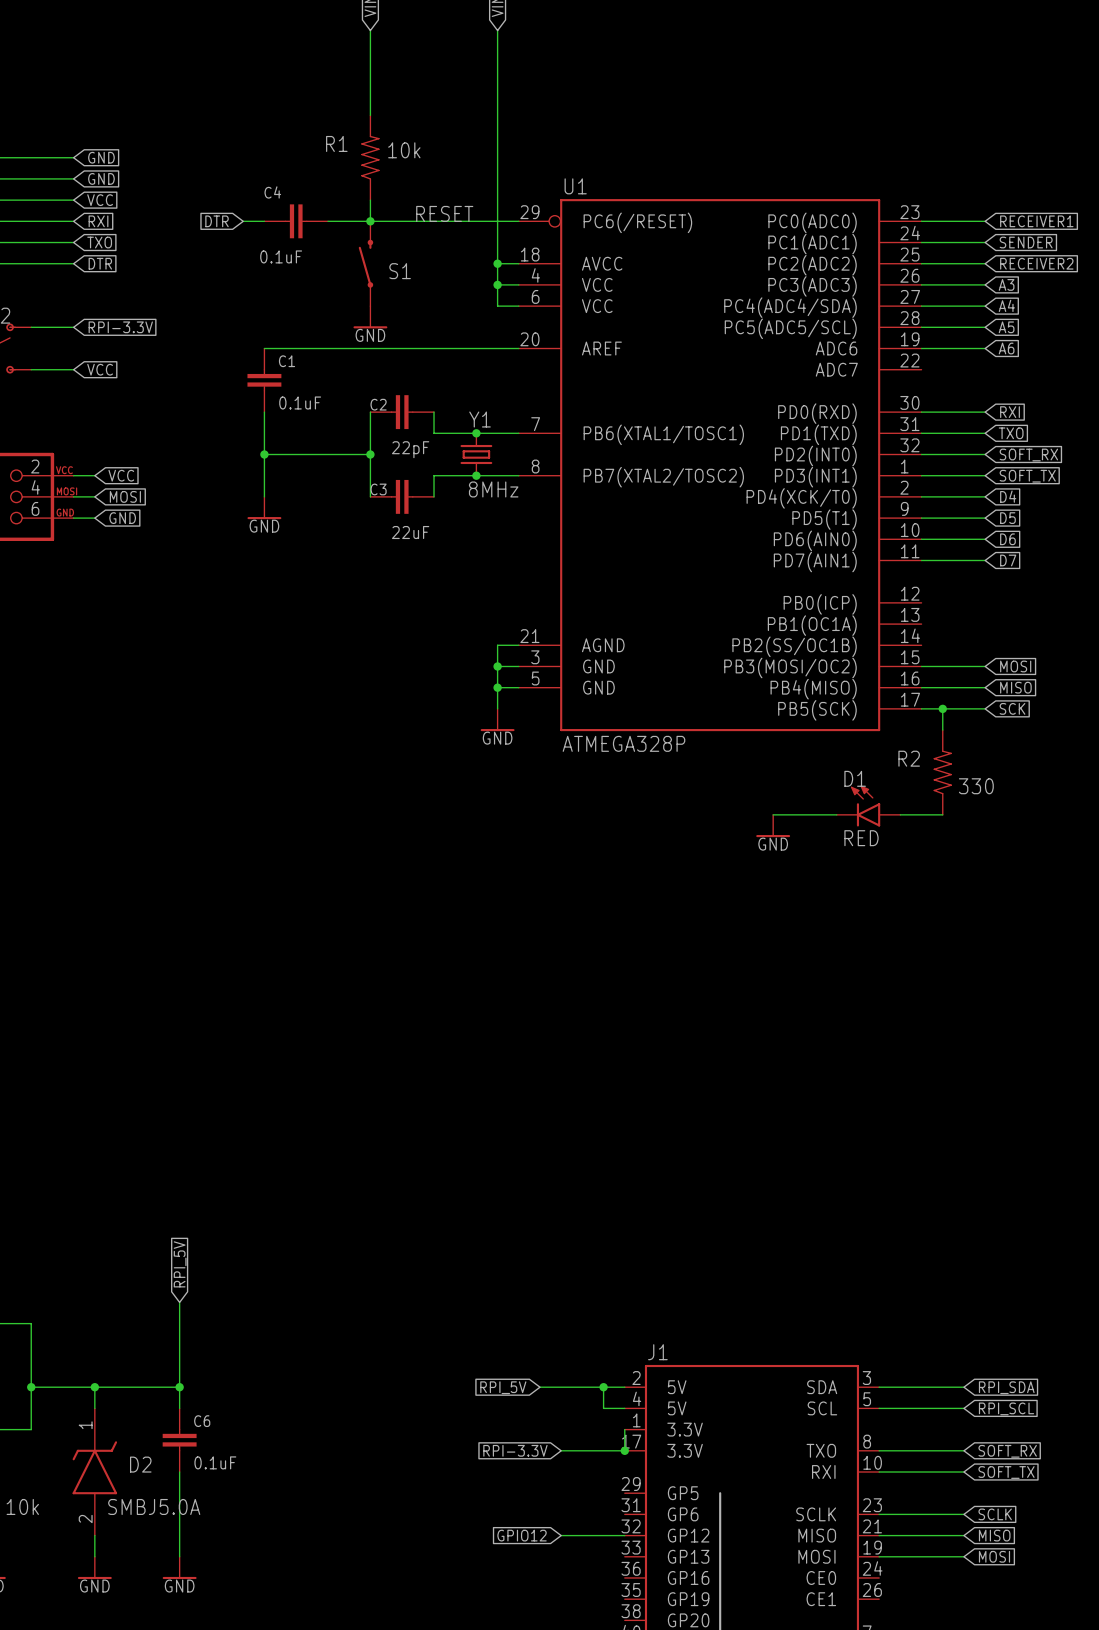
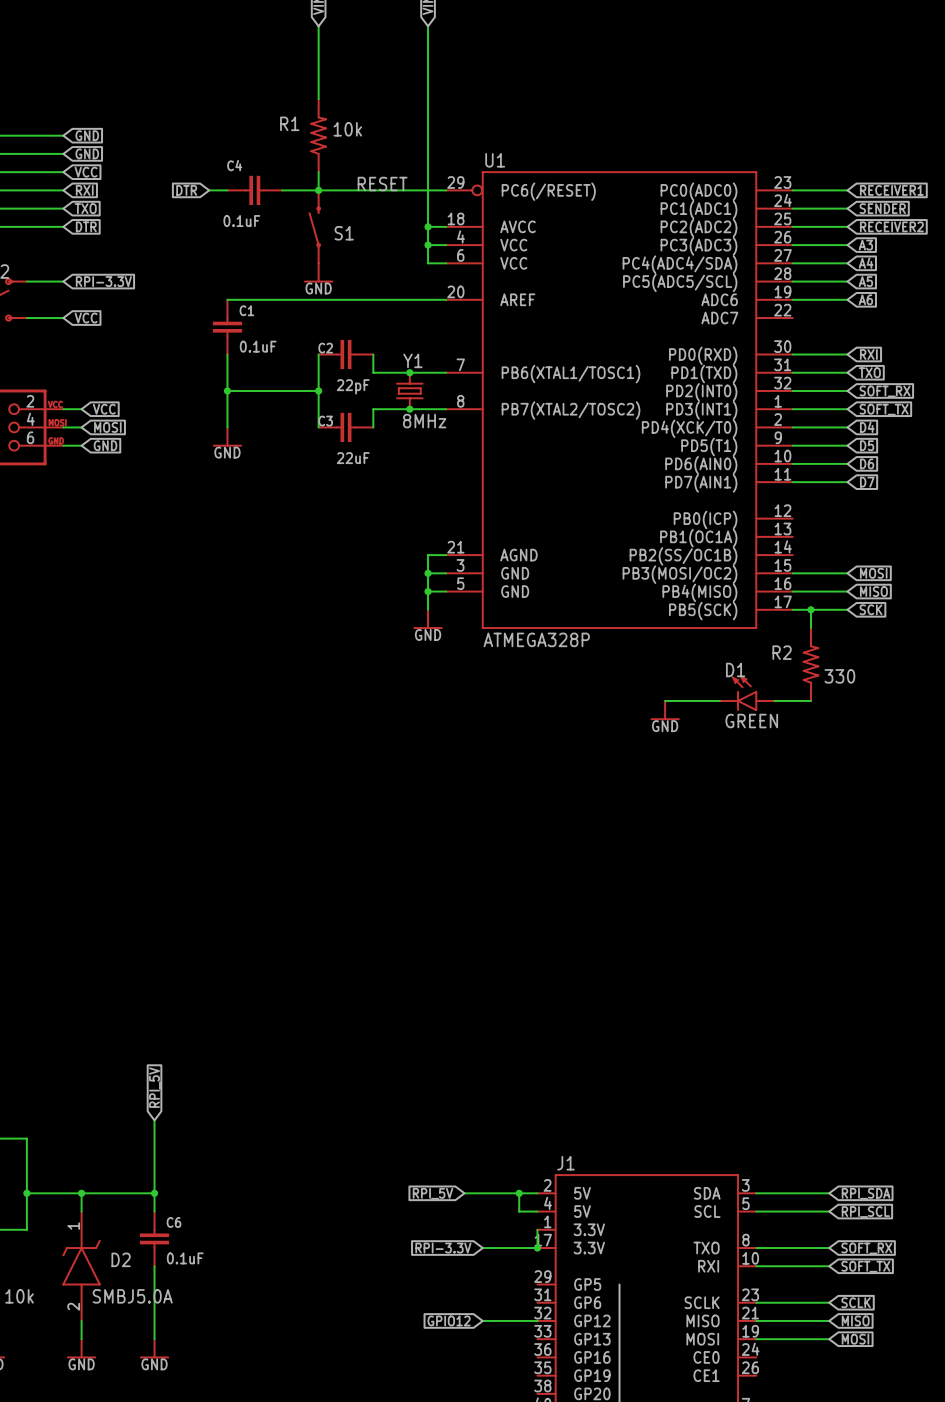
D1 value: RED (861, 838) -> GREEN (751, 721)

